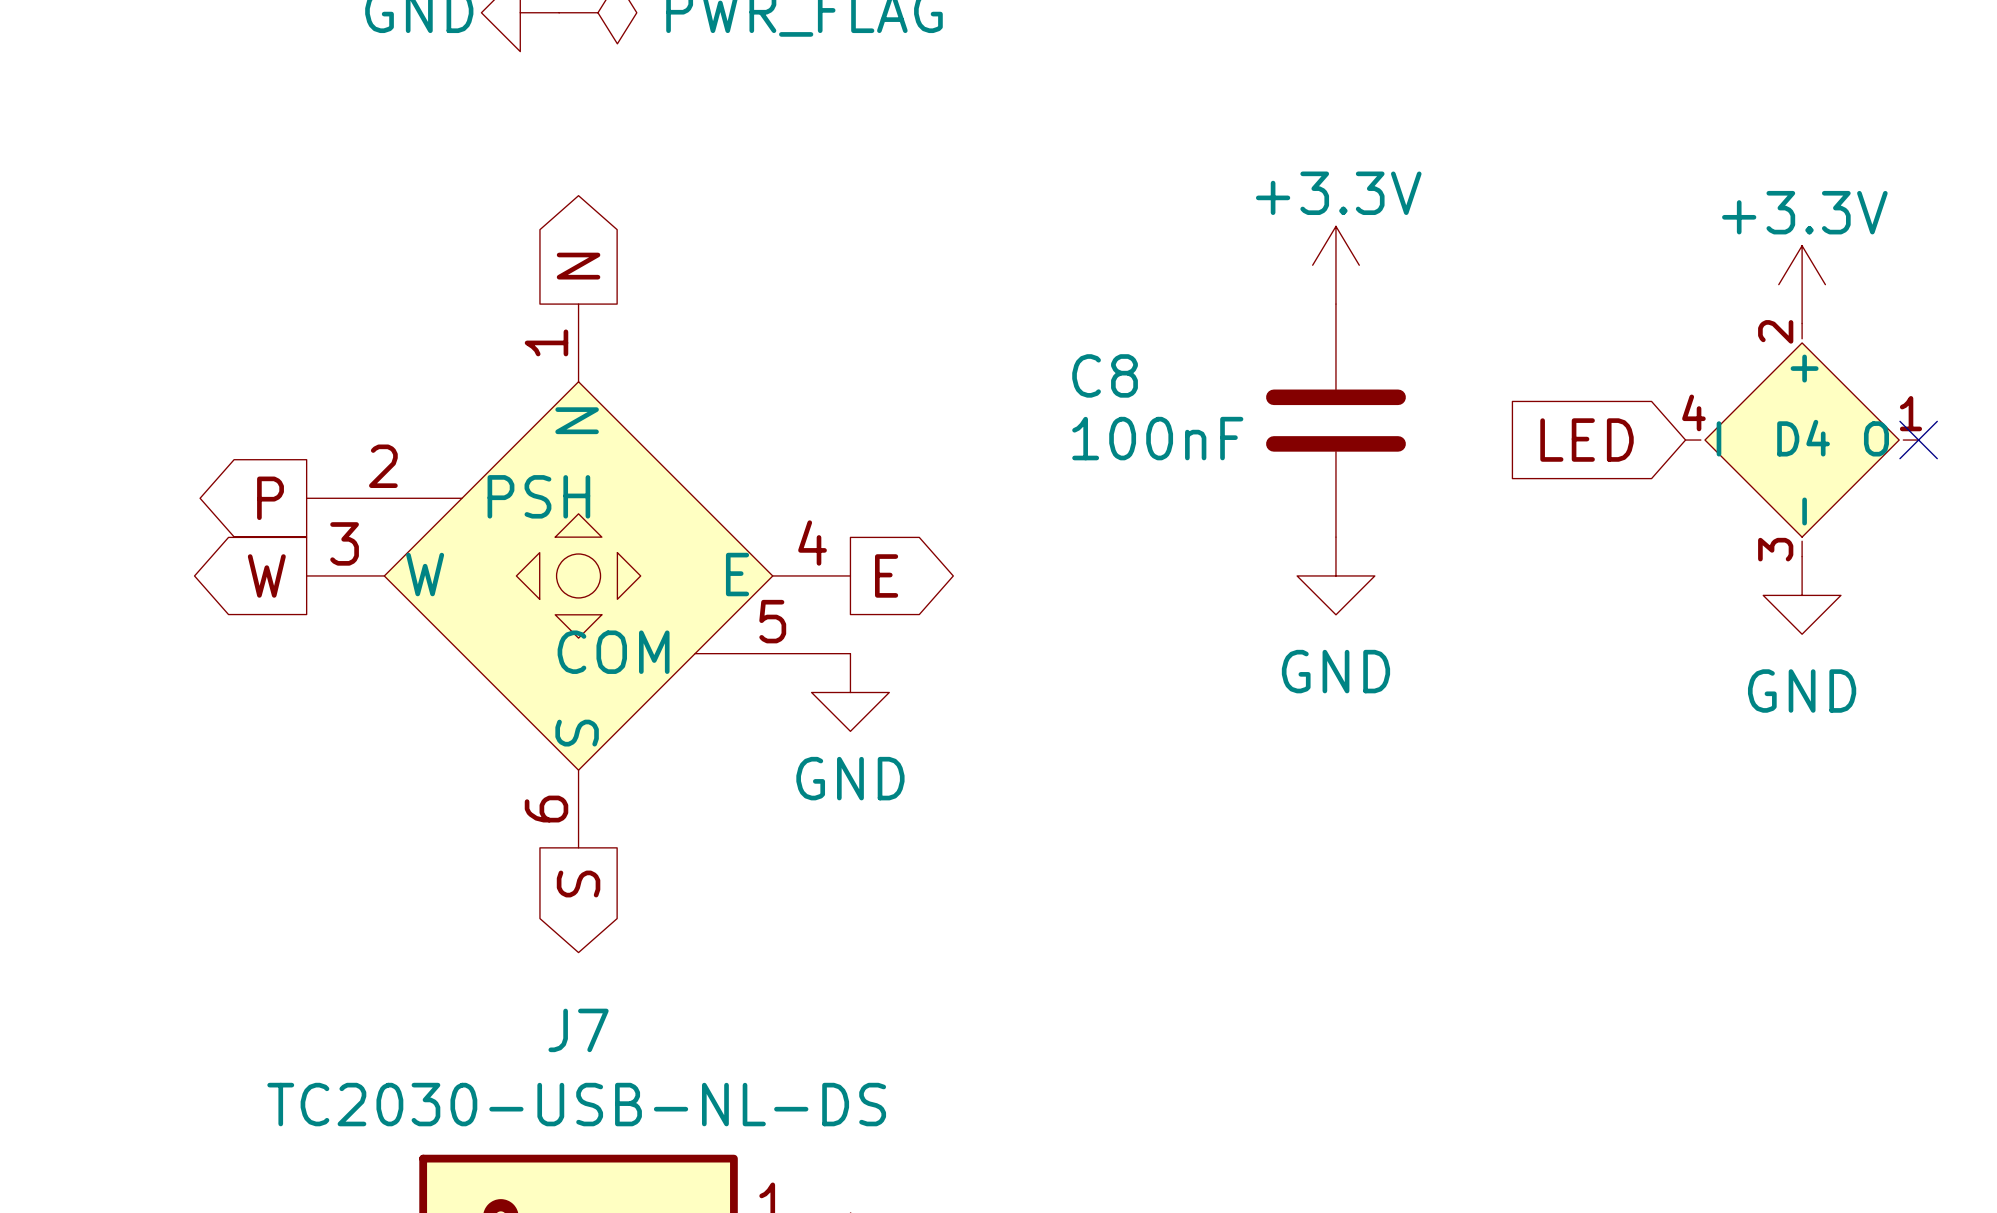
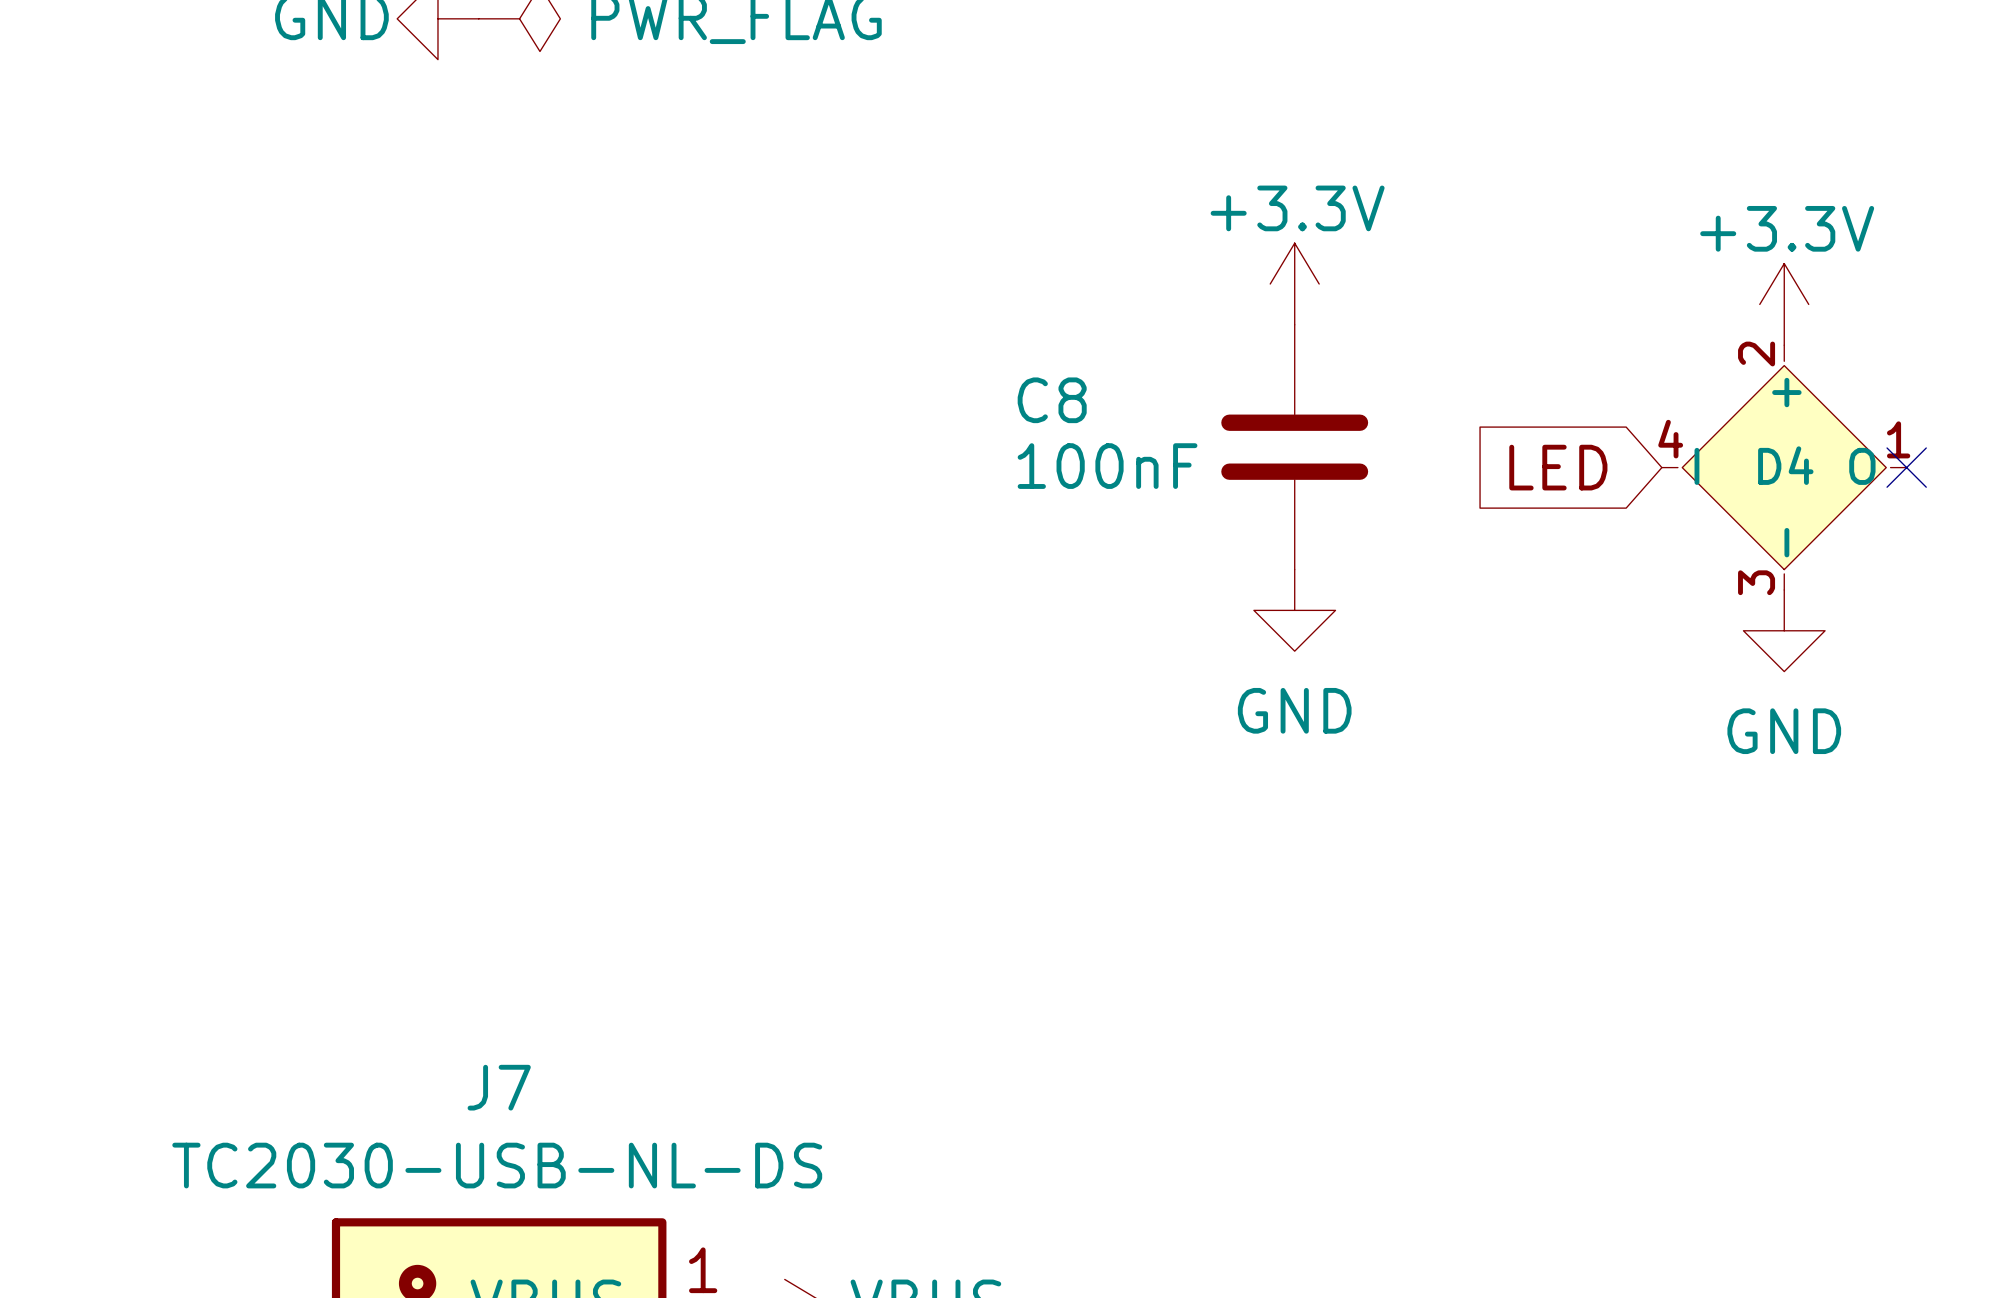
global label: N (578, 266) -> none
global label: P (270, 498) -> none
global label: W (266, 575) -> none
part: (578, 575) -> none
global label: E (886, 575) -> none
power symbol: GND (850, 692) -> none
global label: S (578, 884) -> none

